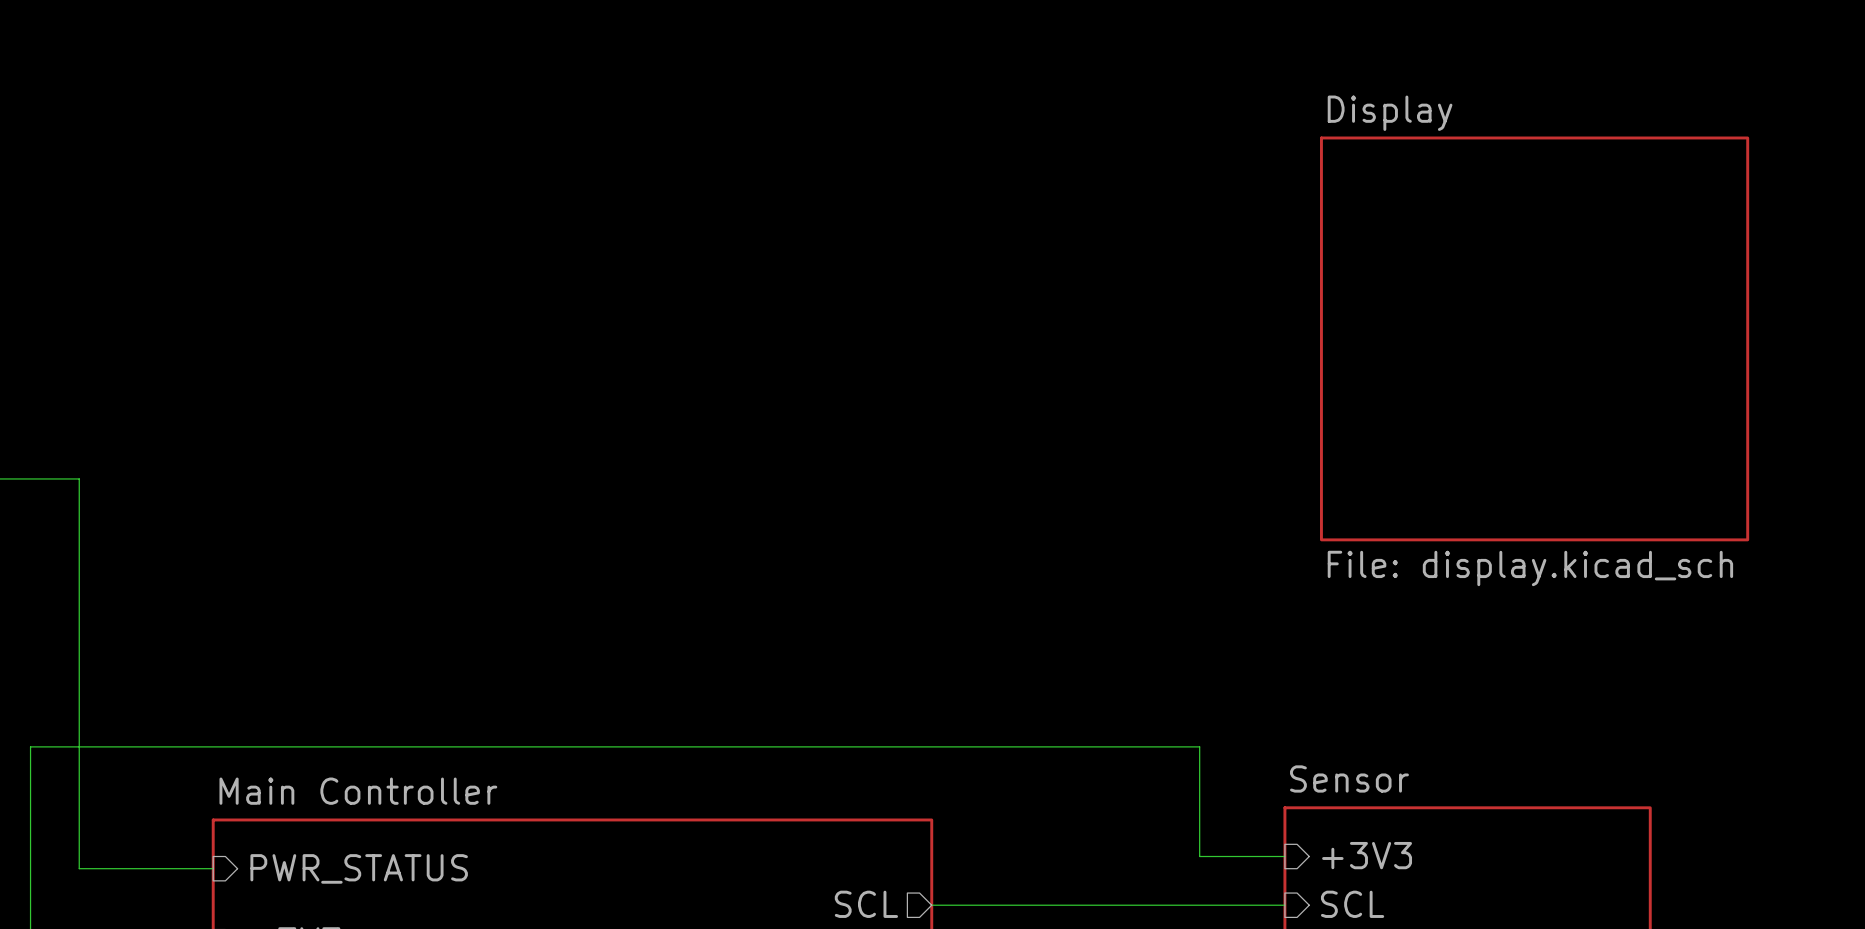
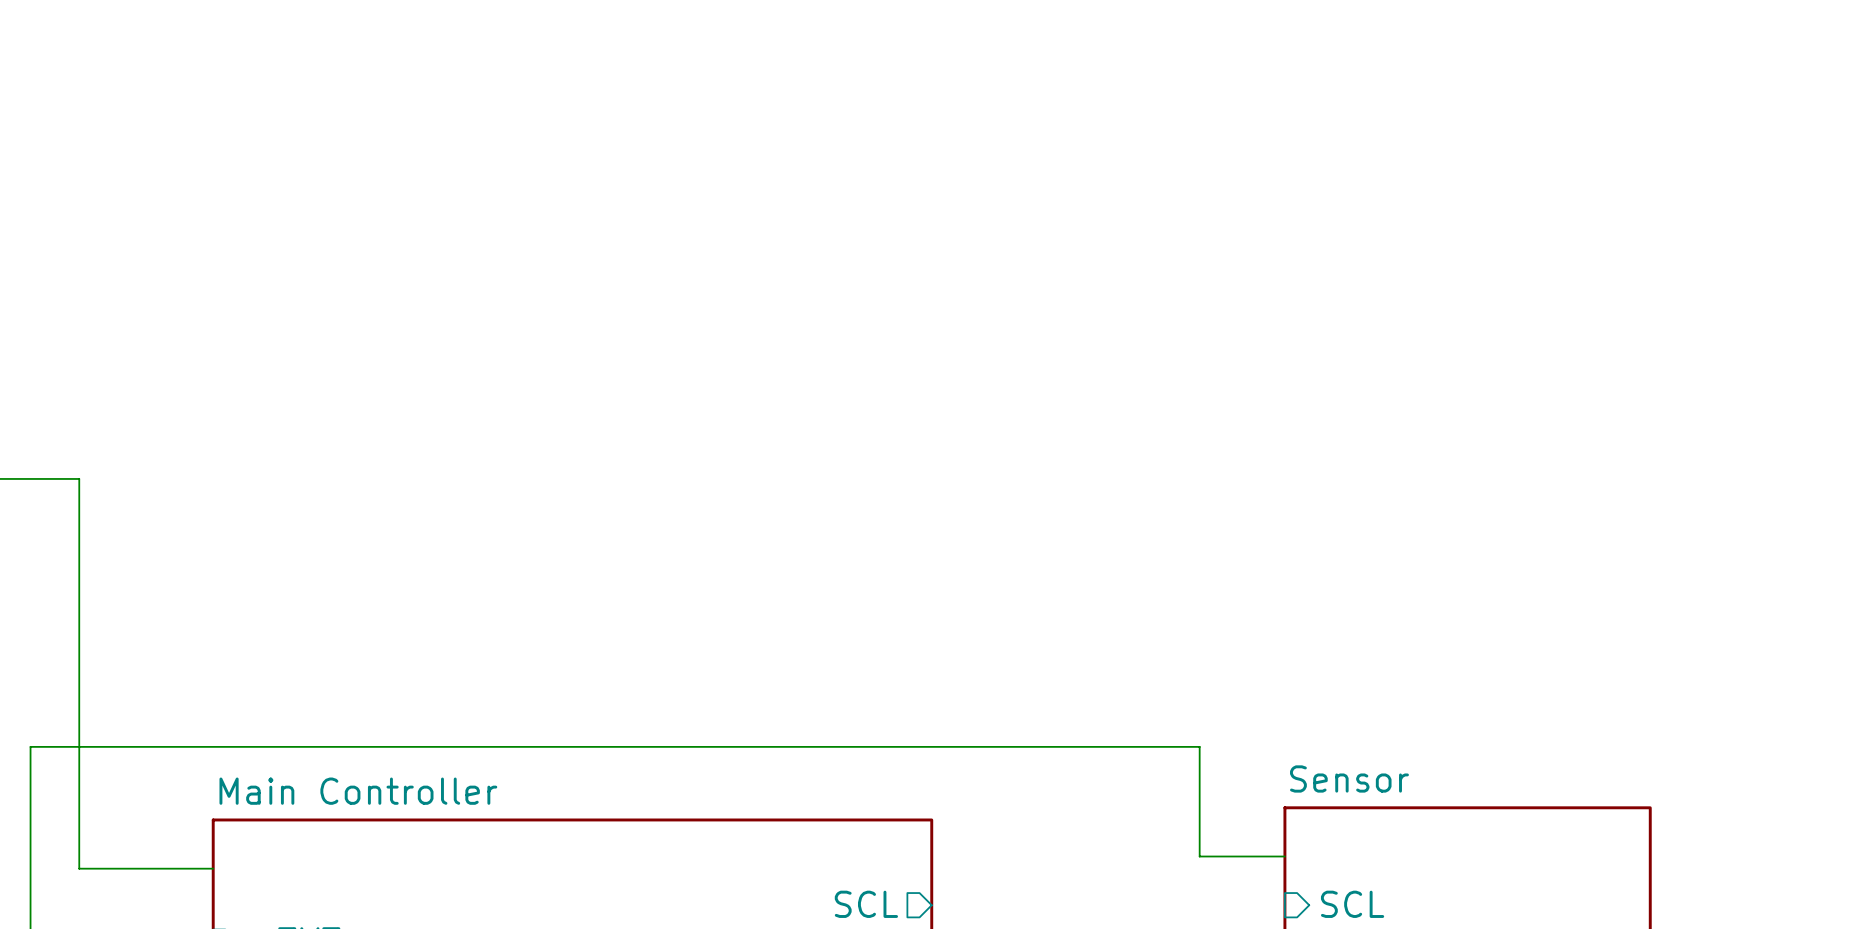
sheet Display: File: display.kicad_sch (1534, 338) -> none
sheet pin: +3V3 (1367, 855) -> none
sheet pin: PWR_STATUS (359, 868) -> none
wire: (931, 905) (1284, 905) -> none

